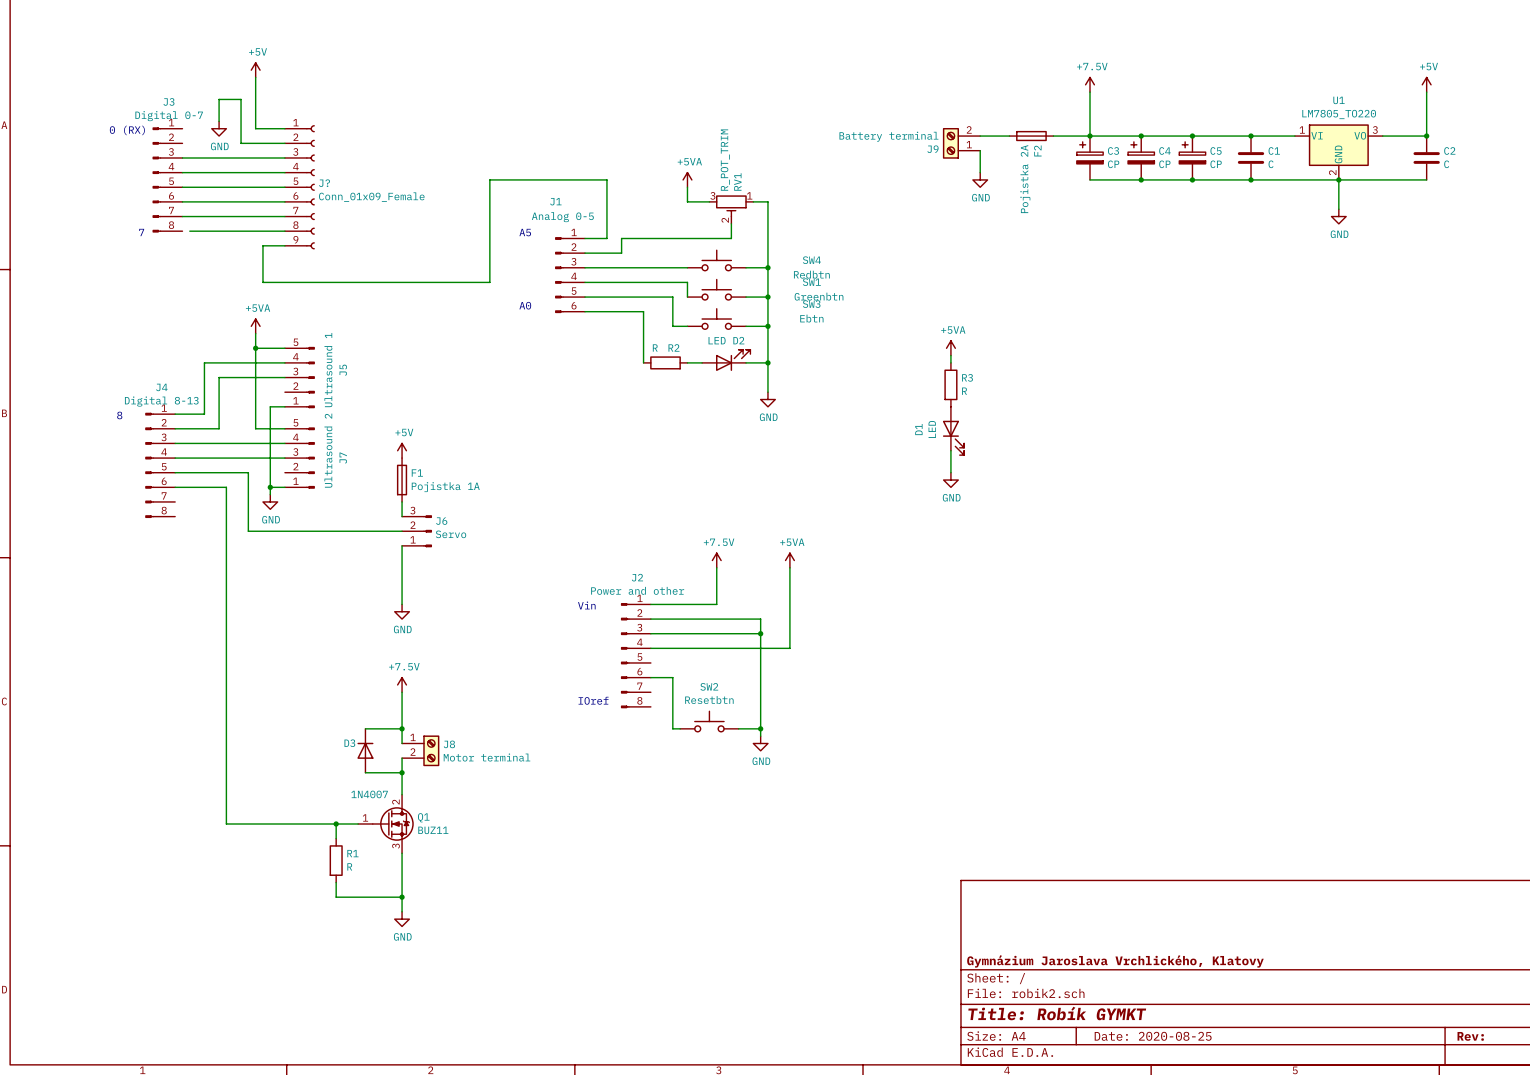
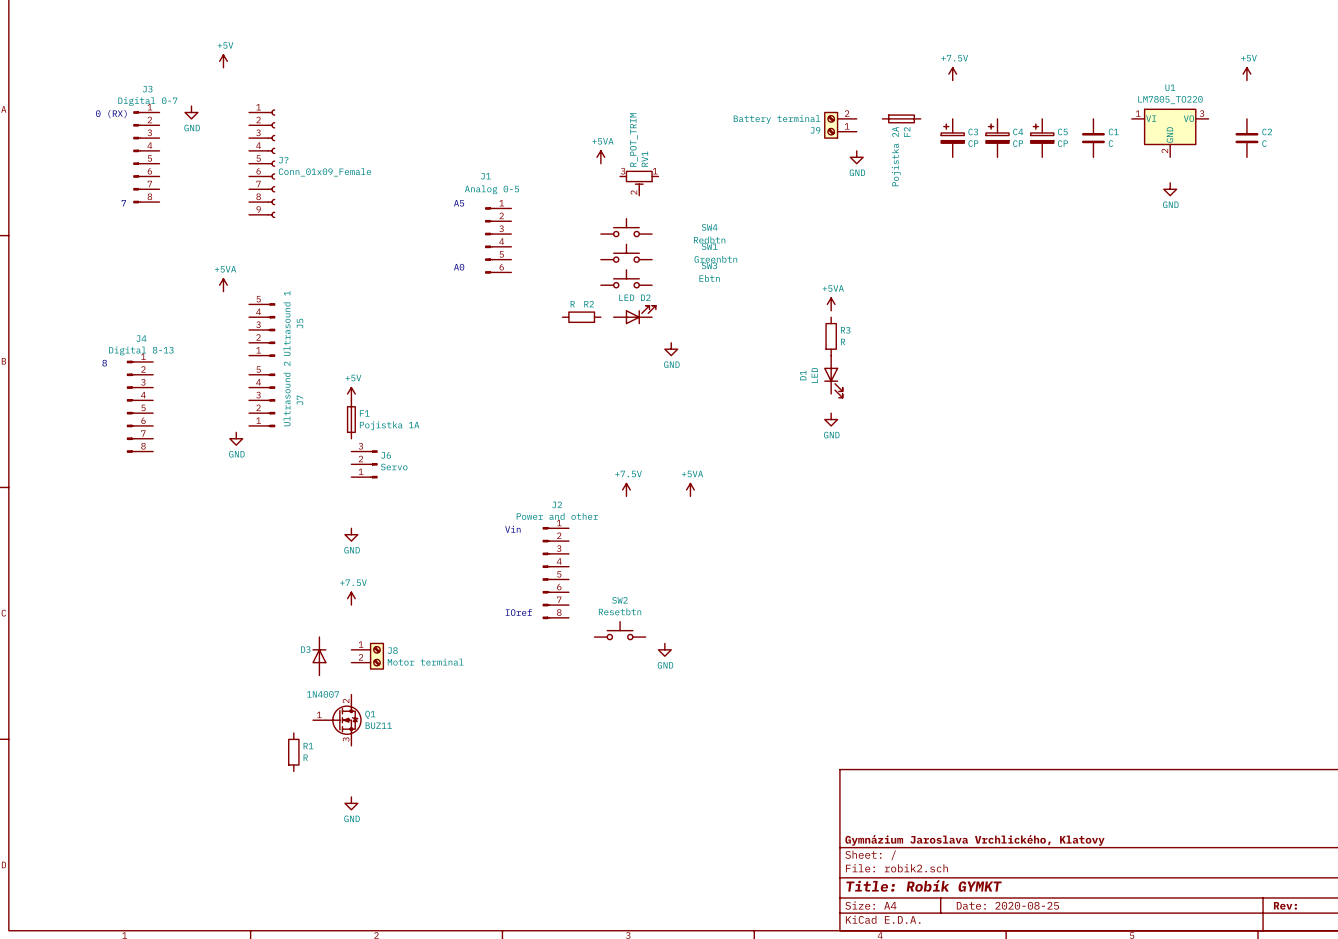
wire: (255, 77) (255, 128) (284, 128) -> none
wire: (1089, 92) (1089, 136) -> none
wire: (1426, 92) (1426, 136) (1382, 136) -> none
wire: (219, 121) (219, 99) (241, 99) (241, 143) (284, 143) -> none
wire: (980, 136) (1009, 136) -> none
wire: (1053, 136) (1294, 136) -> none
junction: (1089, 136) -> none
junction: (1141, 136) -> none
junction: (1192, 136) -> none
junction: (1251, 136) -> none
junction: (1426, 136) -> none
wire: (980, 150) (980, 172) -> none
wire: (182, 157) (284, 157) -> none
wire: (182, 172) (284, 172) -> none
wire: (1089, 179) (1426, 179) -> none
junction: (1141, 179) -> none
junction: (1192, 179) -> none
junction: (1251, 179) -> none
wire: (1338, 179) (1338, 209) -> none
junction: (1338, 179) -> none
wire: (182, 187) (284, 187) -> none
wire: (687, 187) (687, 201) (709, 201) -> none
wire: (182, 201) (284, 201) -> none
wire: (753, 201) (767, 201) (767, 392) -> none
wire: (182, 216) (284, 216) -> none
wire: (731, 223) (731, 238) (621, 238) (621, 253) (585, 253) -> none
wire: (189, 231) (284, 231) -> none
wire: (585, 238) (606, 238) (606, 179) (489, 179) (489, 282) (262, 282) (262, 245) (284, 245) -> none
wire: (585, 267) (687, 267) -> none
wire: (746, 267) (767, 267) -> none
junction: (767, 267) -> none
wire: (585, 282) (687, 282) (687, 297) -> none
wire: (585, 297) (672, 297) (672, 326) (687, 326) -> none
wire: (746, 297) (767, 297) -> none
junction: (767, 297) -> none
wire: (585, 311) (643, 311) (643, 362) -> none
wire: (746, 326) (767, 326) -> none
junction: (767, 326) -> none
wire: (255, 333) (255, 428) (284, 428) -> none
wire: (255, 348) (284, 348) -> none
junction: (255, 348) -> none
wire: (950, 355) (950, 362) -> none
wire: (284, 362) (204, 362) (204, 414) (175, 414) -> none
wire: (687, 362) (702, 362) -> none
wire: (746, 362) (767, 362) -> none
junction: (767, 362) -> none
wire: (284, 377) (219, 377) (219, 428) (175, 428) -> none
wire: (284, 406) (270, 406) (270, 494) -> none
wire: (175, 443) (284, 443) -> none
wire: (950, 450) (950, 472) -> none
wire: (175, 458) (284, 458) -> none
wire: (175, 472) (248, 472) (248, 531) (402, 531) -> none
wire: (175, 487) (226, 487) (226, 824) (358, 824) -> none
wire: (270, 487) (284, 487) -> none
junction: (270, 487) -> none
wire: (402, 501) (402, 516) -> none
wire: (402, 545) (402, 604) -> none
wire: (716, 567) (716, 604) (650, 604) -> none
wire: (789, 567) (789, 648) (650, 648) -> none
wire: (650, 619) (760, 619) (760, 736) -> none
wire: (650, 633) (760, 633) -> none
junction: (760, 633) -> none
wire: (650, 677) (672, 677) (672, 728) (680, 728) -> none
wire: (402, 692) (402, 743) -> none
wire: (365, 728) (402, 728) -> none
junction: (402, 728) -> none
wire: (738, 728) (760, 728) -> none
junction: (760, 728) -> none
wire: (402, 758) (402, 794) -> none
wire: (365, 772) (402, 772) -> none
junction: (402, 772) -> none
wire: (336, 824) (336, 838) -> none
junction: (336, 824) -> none
wire: (402, 853) (402, 911) -> none
wire: (336, 882) (336, 897) (402, 897) -> none
junction: (402, 897) -> none

